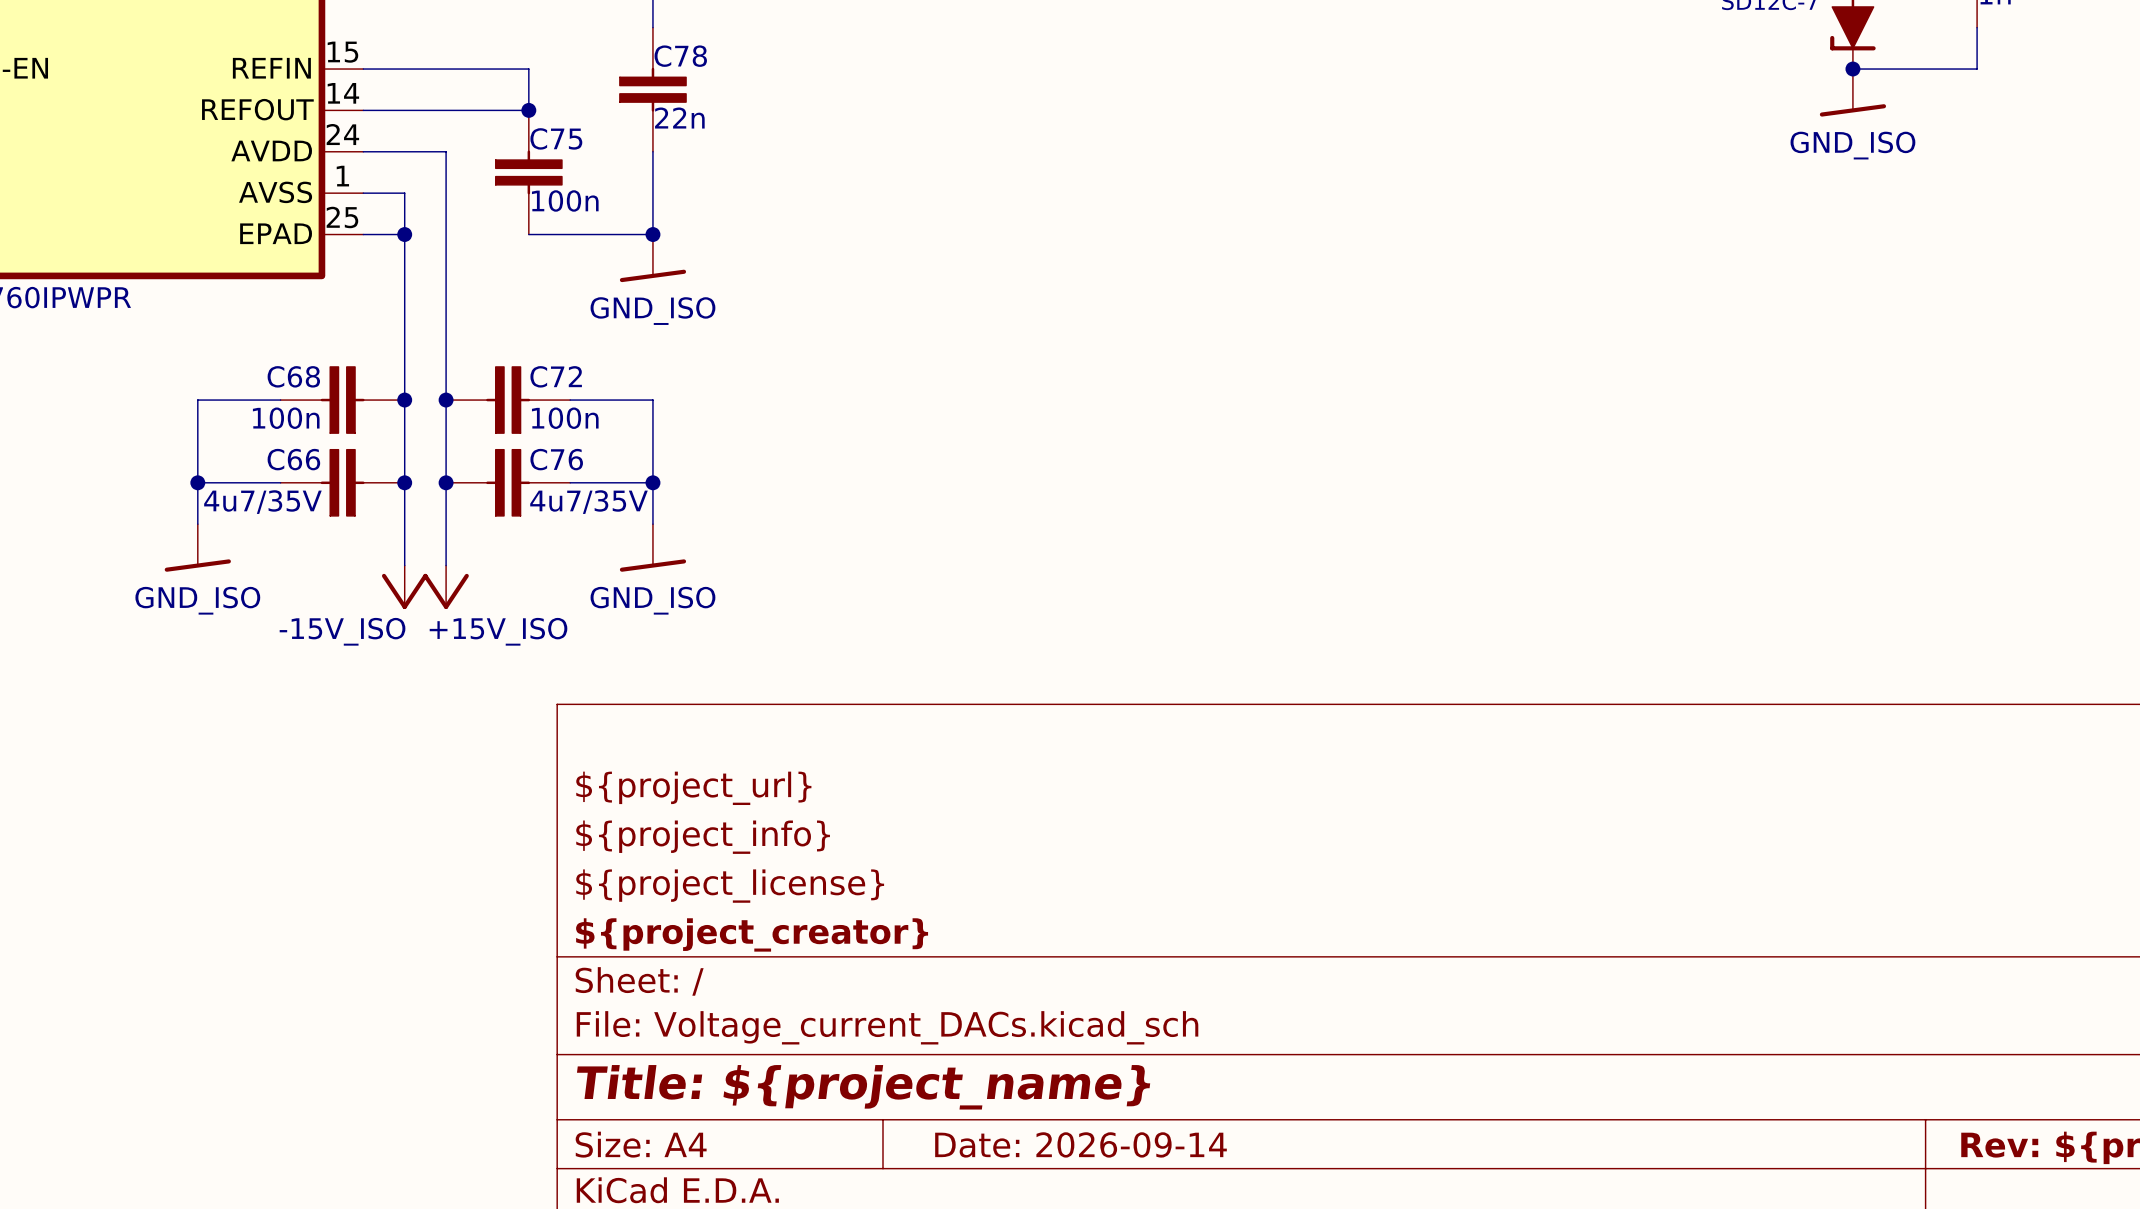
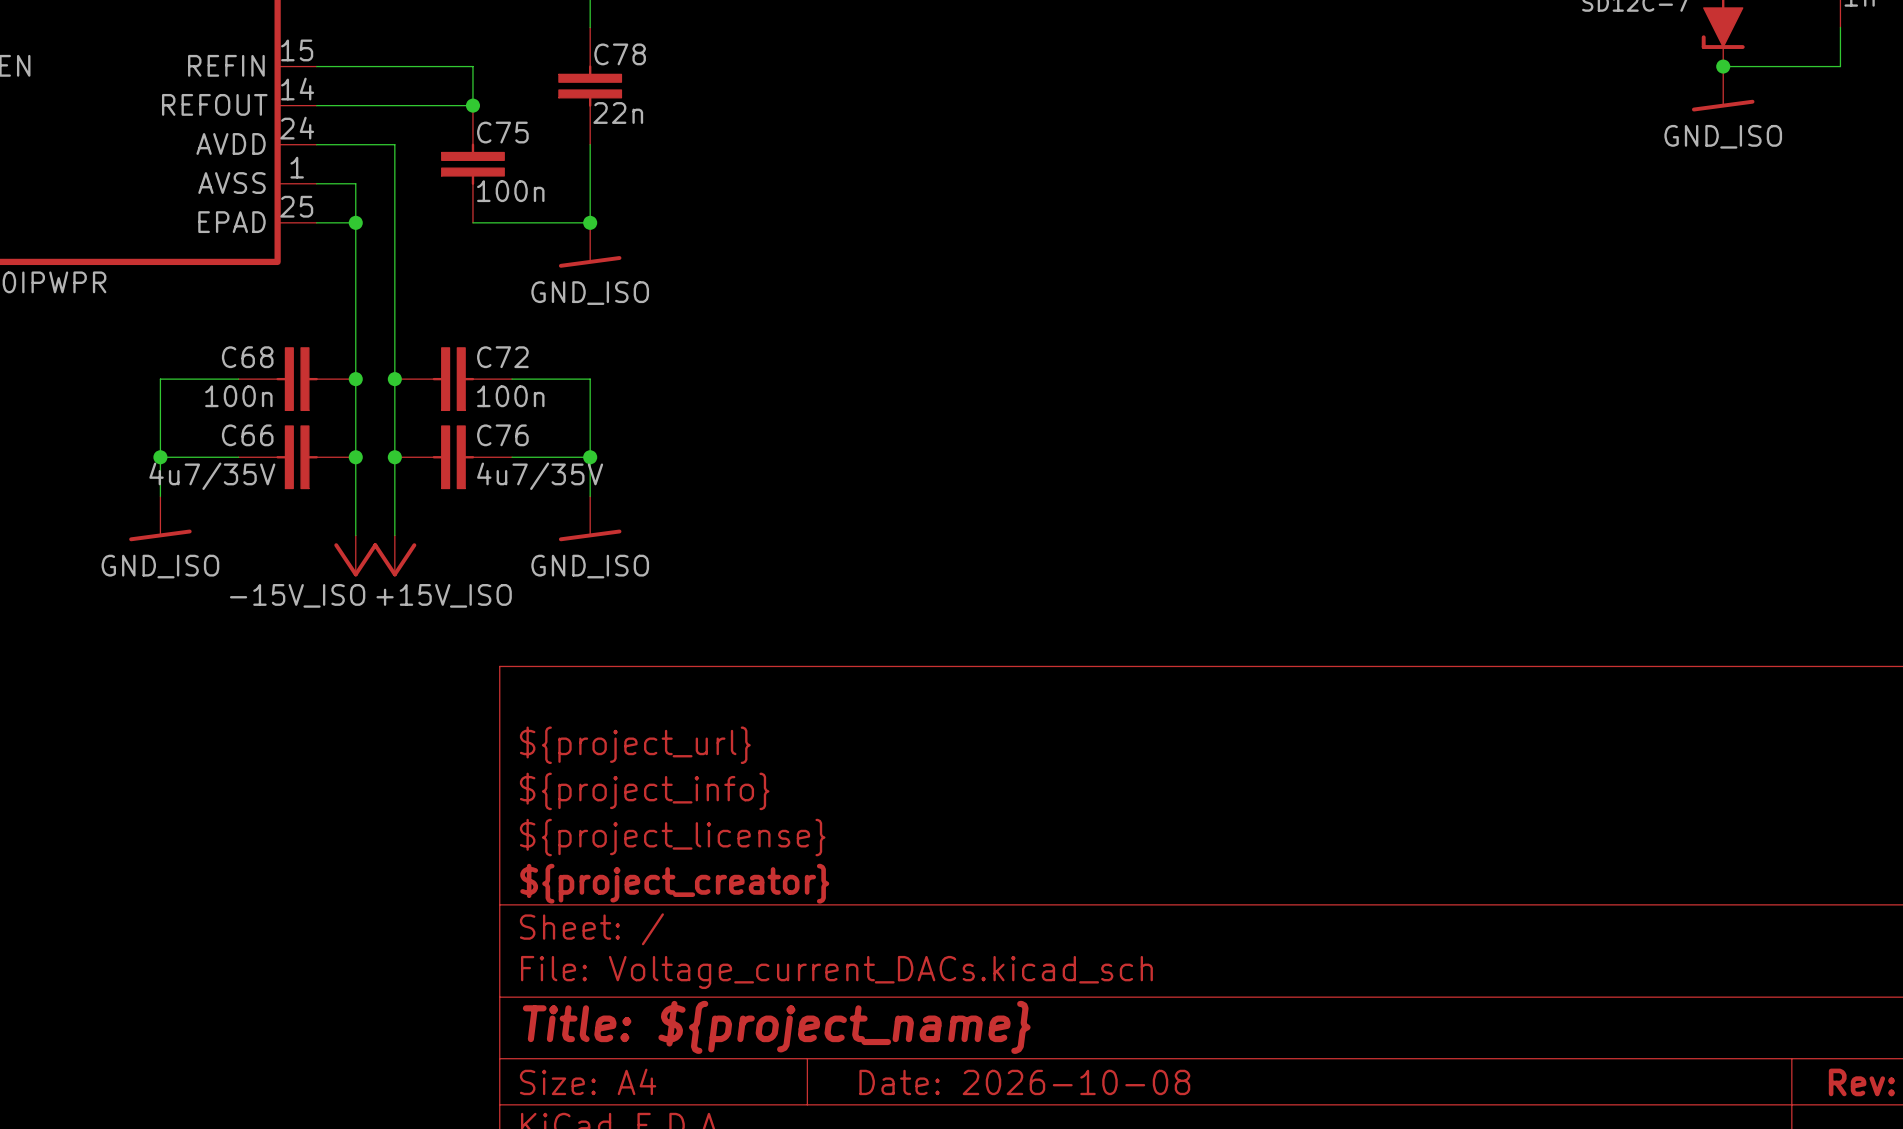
title block: Date: 2026-09-14 (1080, 1144) -> Date: 2026-10-08 (1024, 1082)

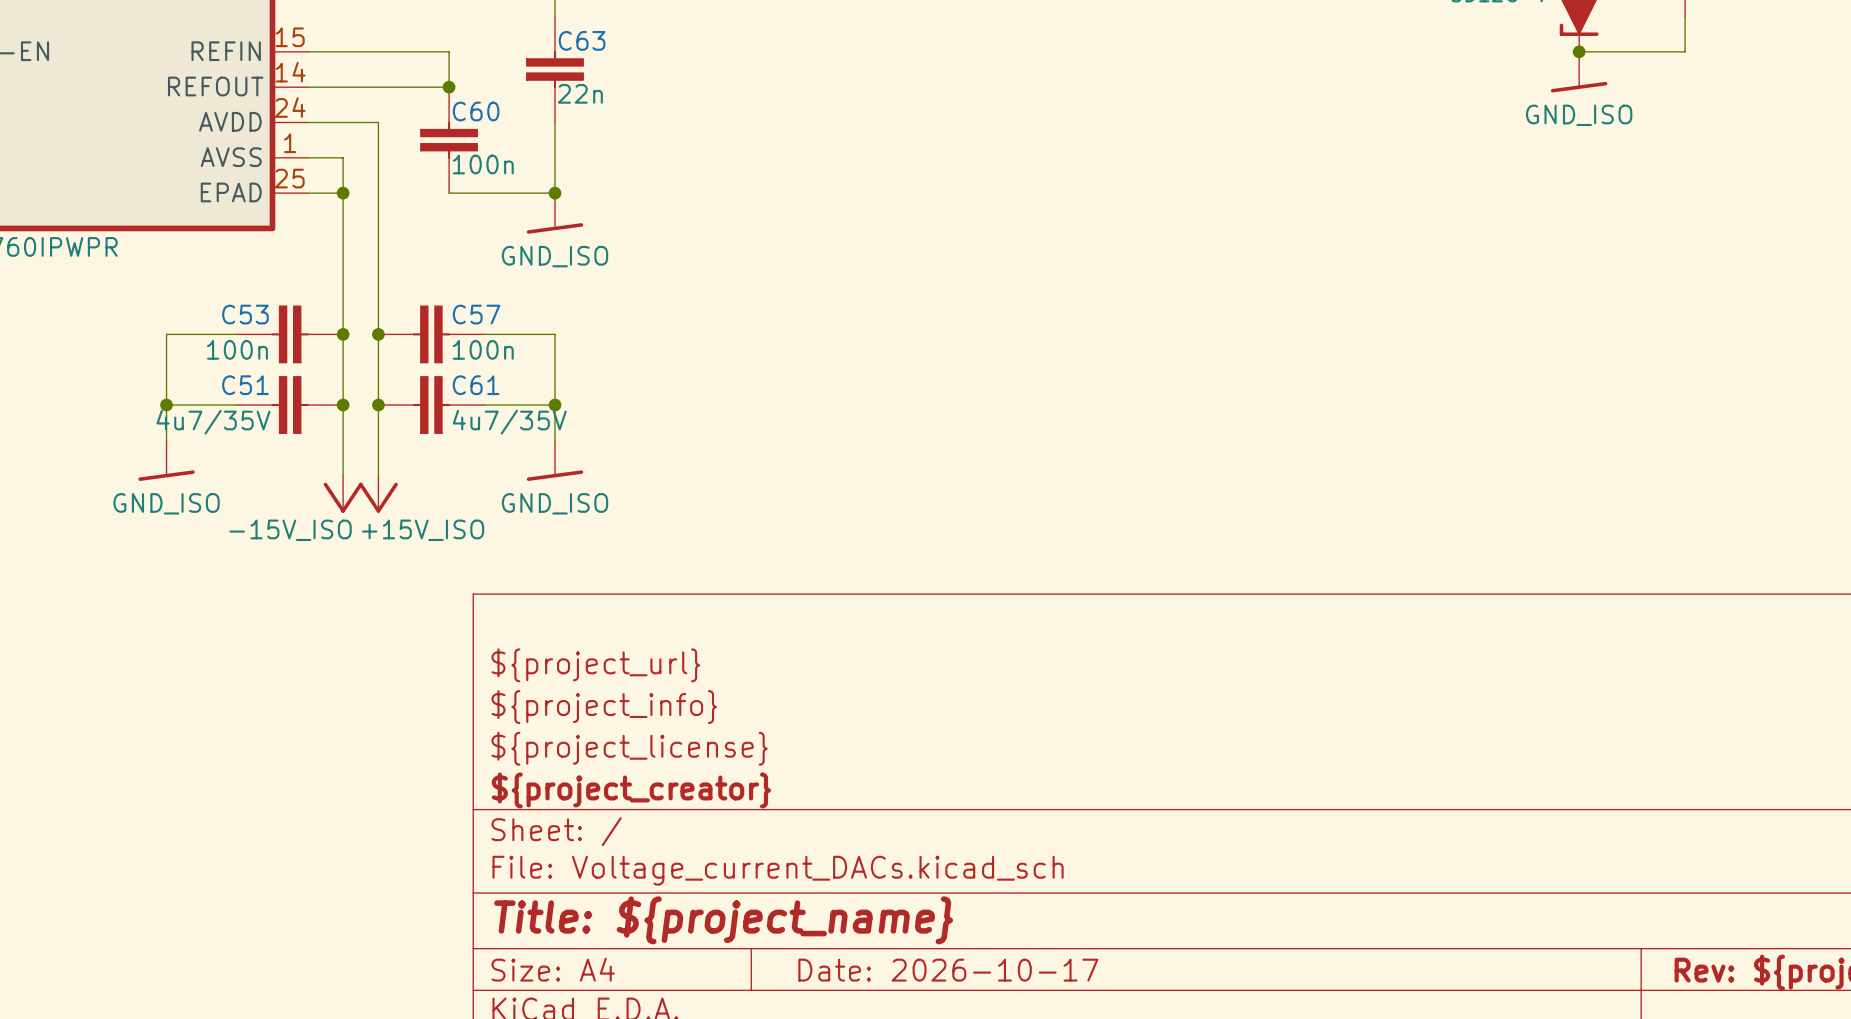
C78 name: C78 (620, 54) -> C63 (582, 40)
C75 name: C75 (502, 132) -> C60 (476, 111)
C68 name: C68 (247, 357) -> C53 (245, 314)
C72 name: C72 (502, 357) -> C57 (476, 314)
C66 name: C66 (247, 435) -> C51 (245, 385)
C76 name: C76 (502, 435) -> C61 (476, 385)
title block: Date: 2026-10-08 (1024, 1082) -> Date: 2026-10-17 (948, 970)

